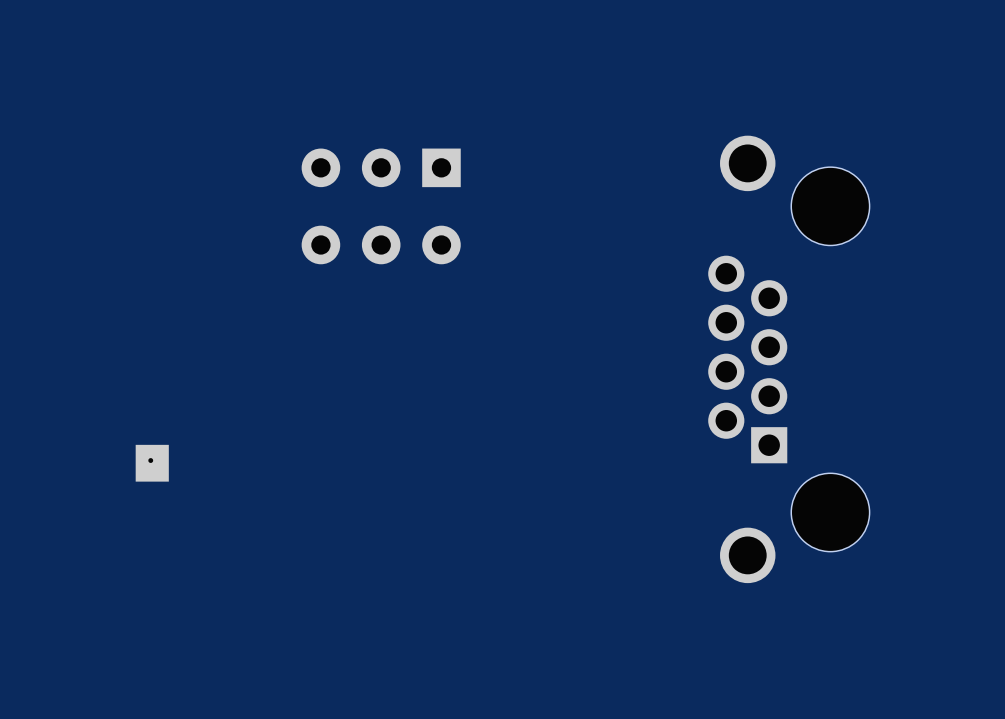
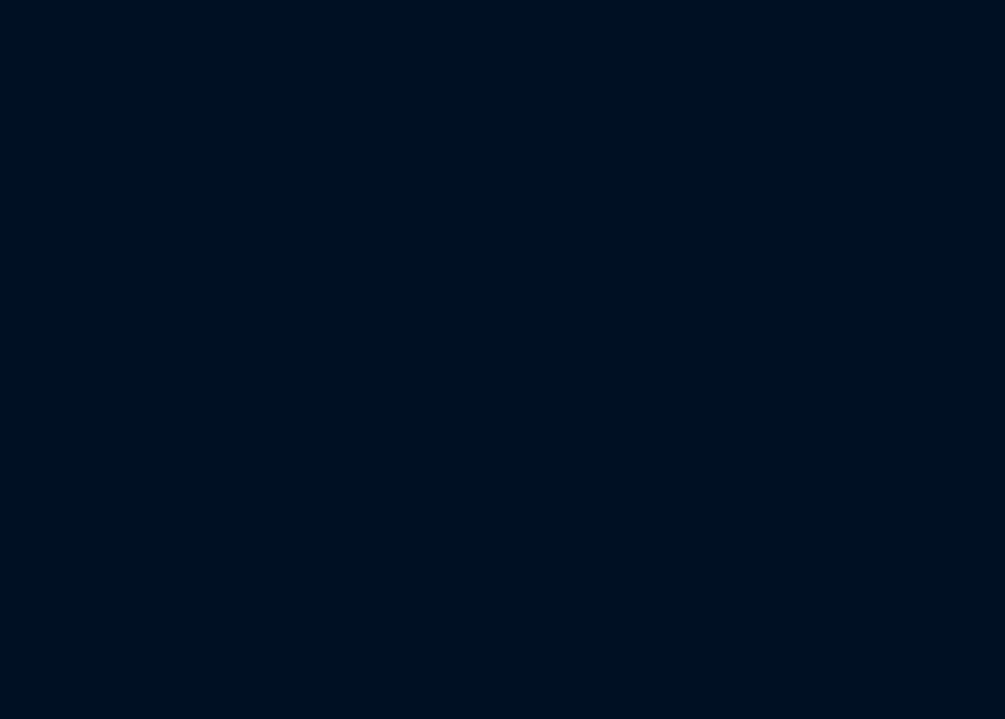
part: (381, 206) -> none
part: (788, 359) -> none
part: (152, 463) -> none

